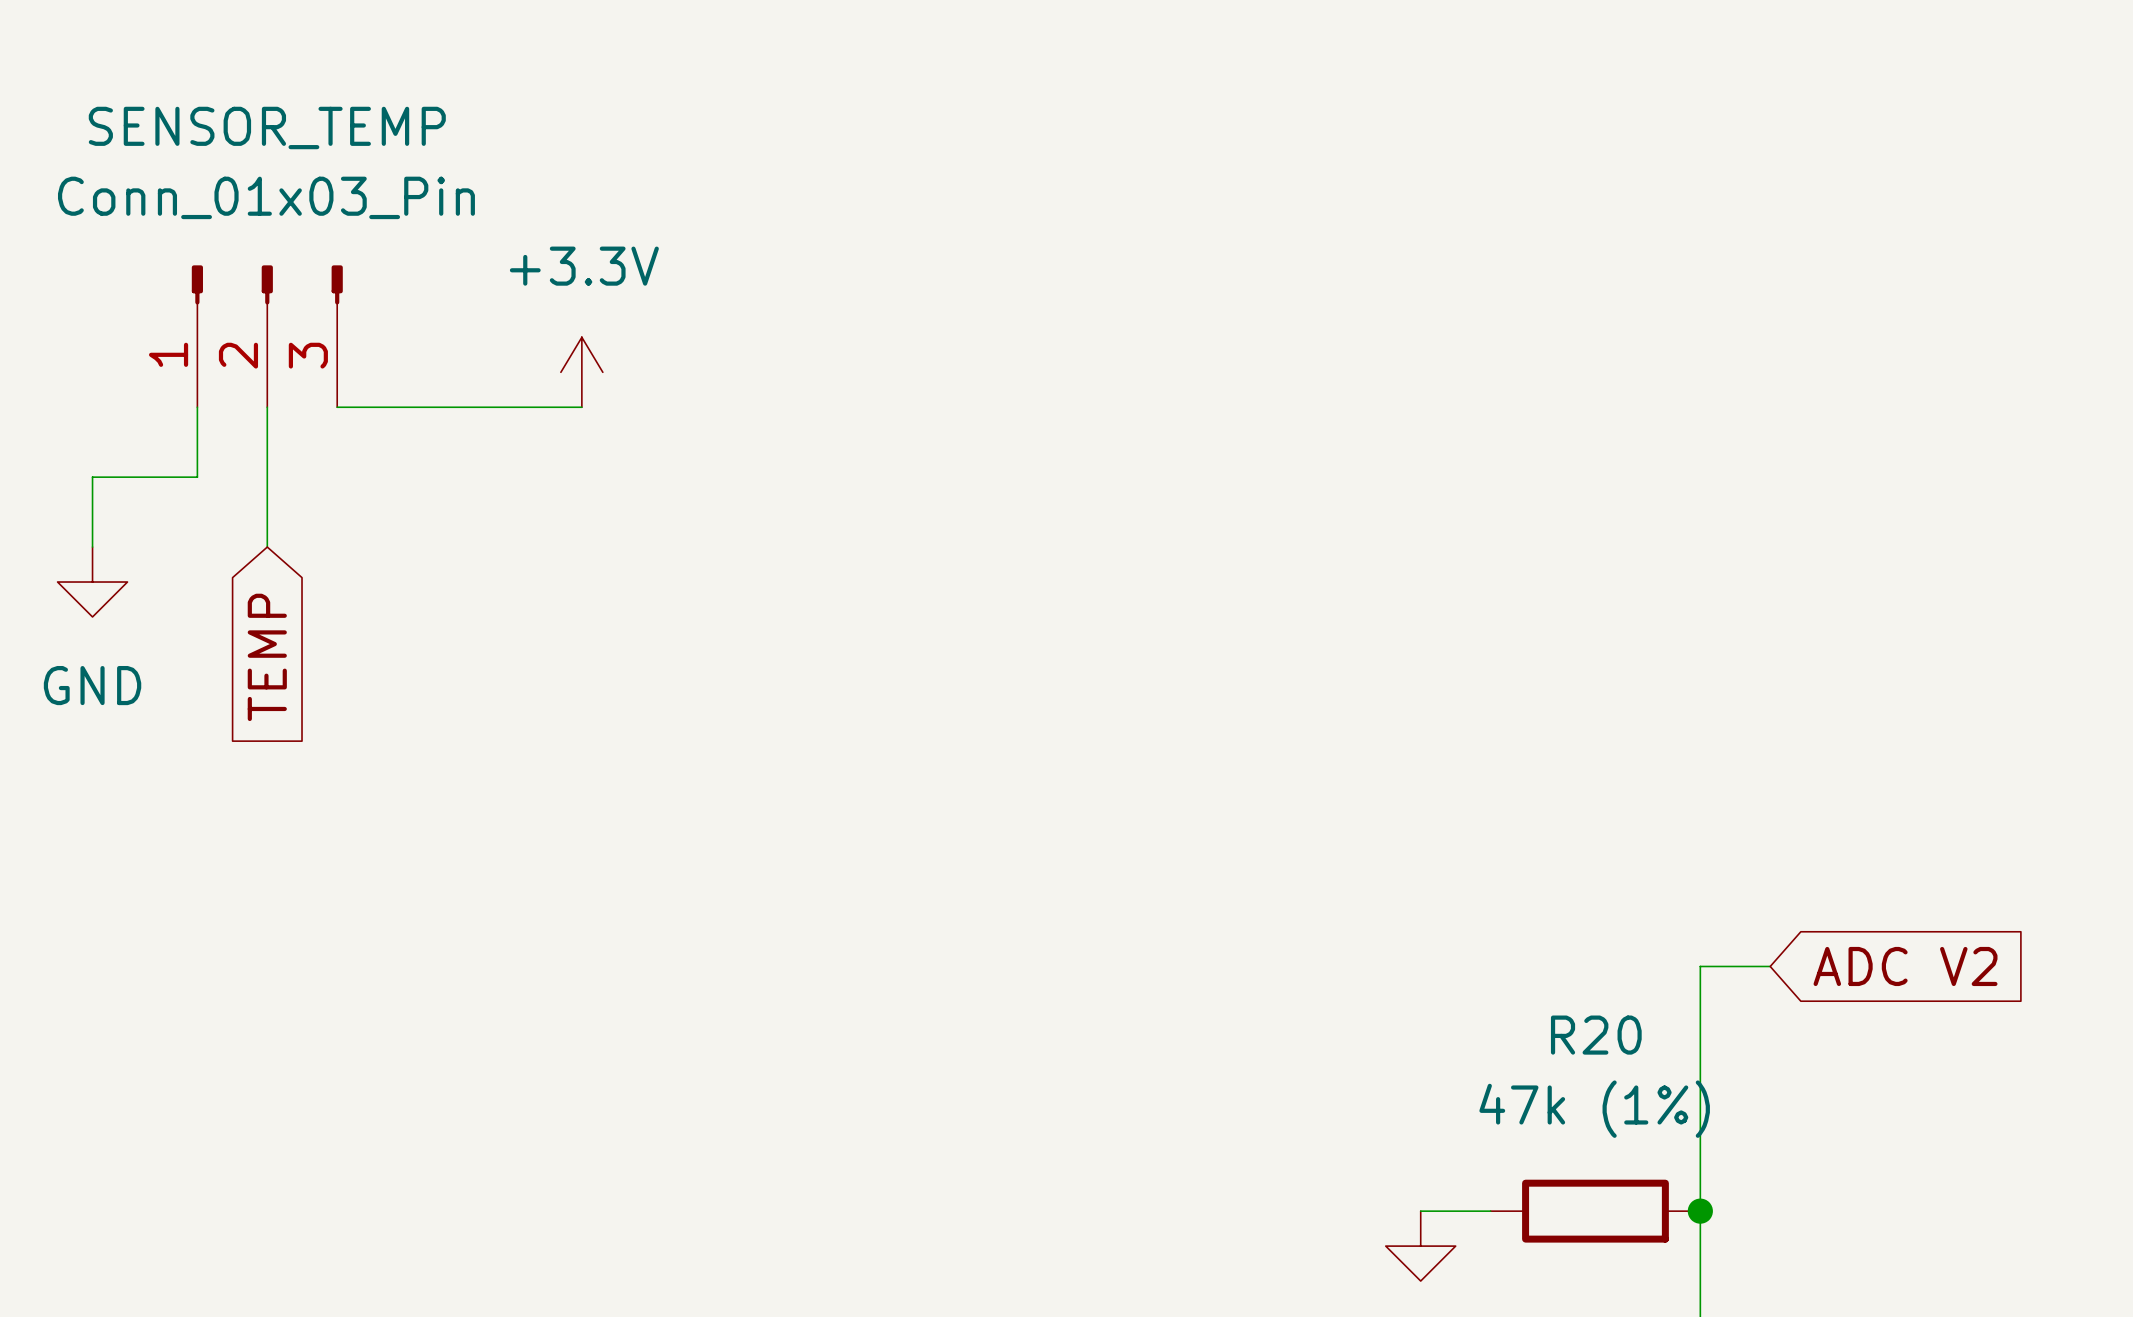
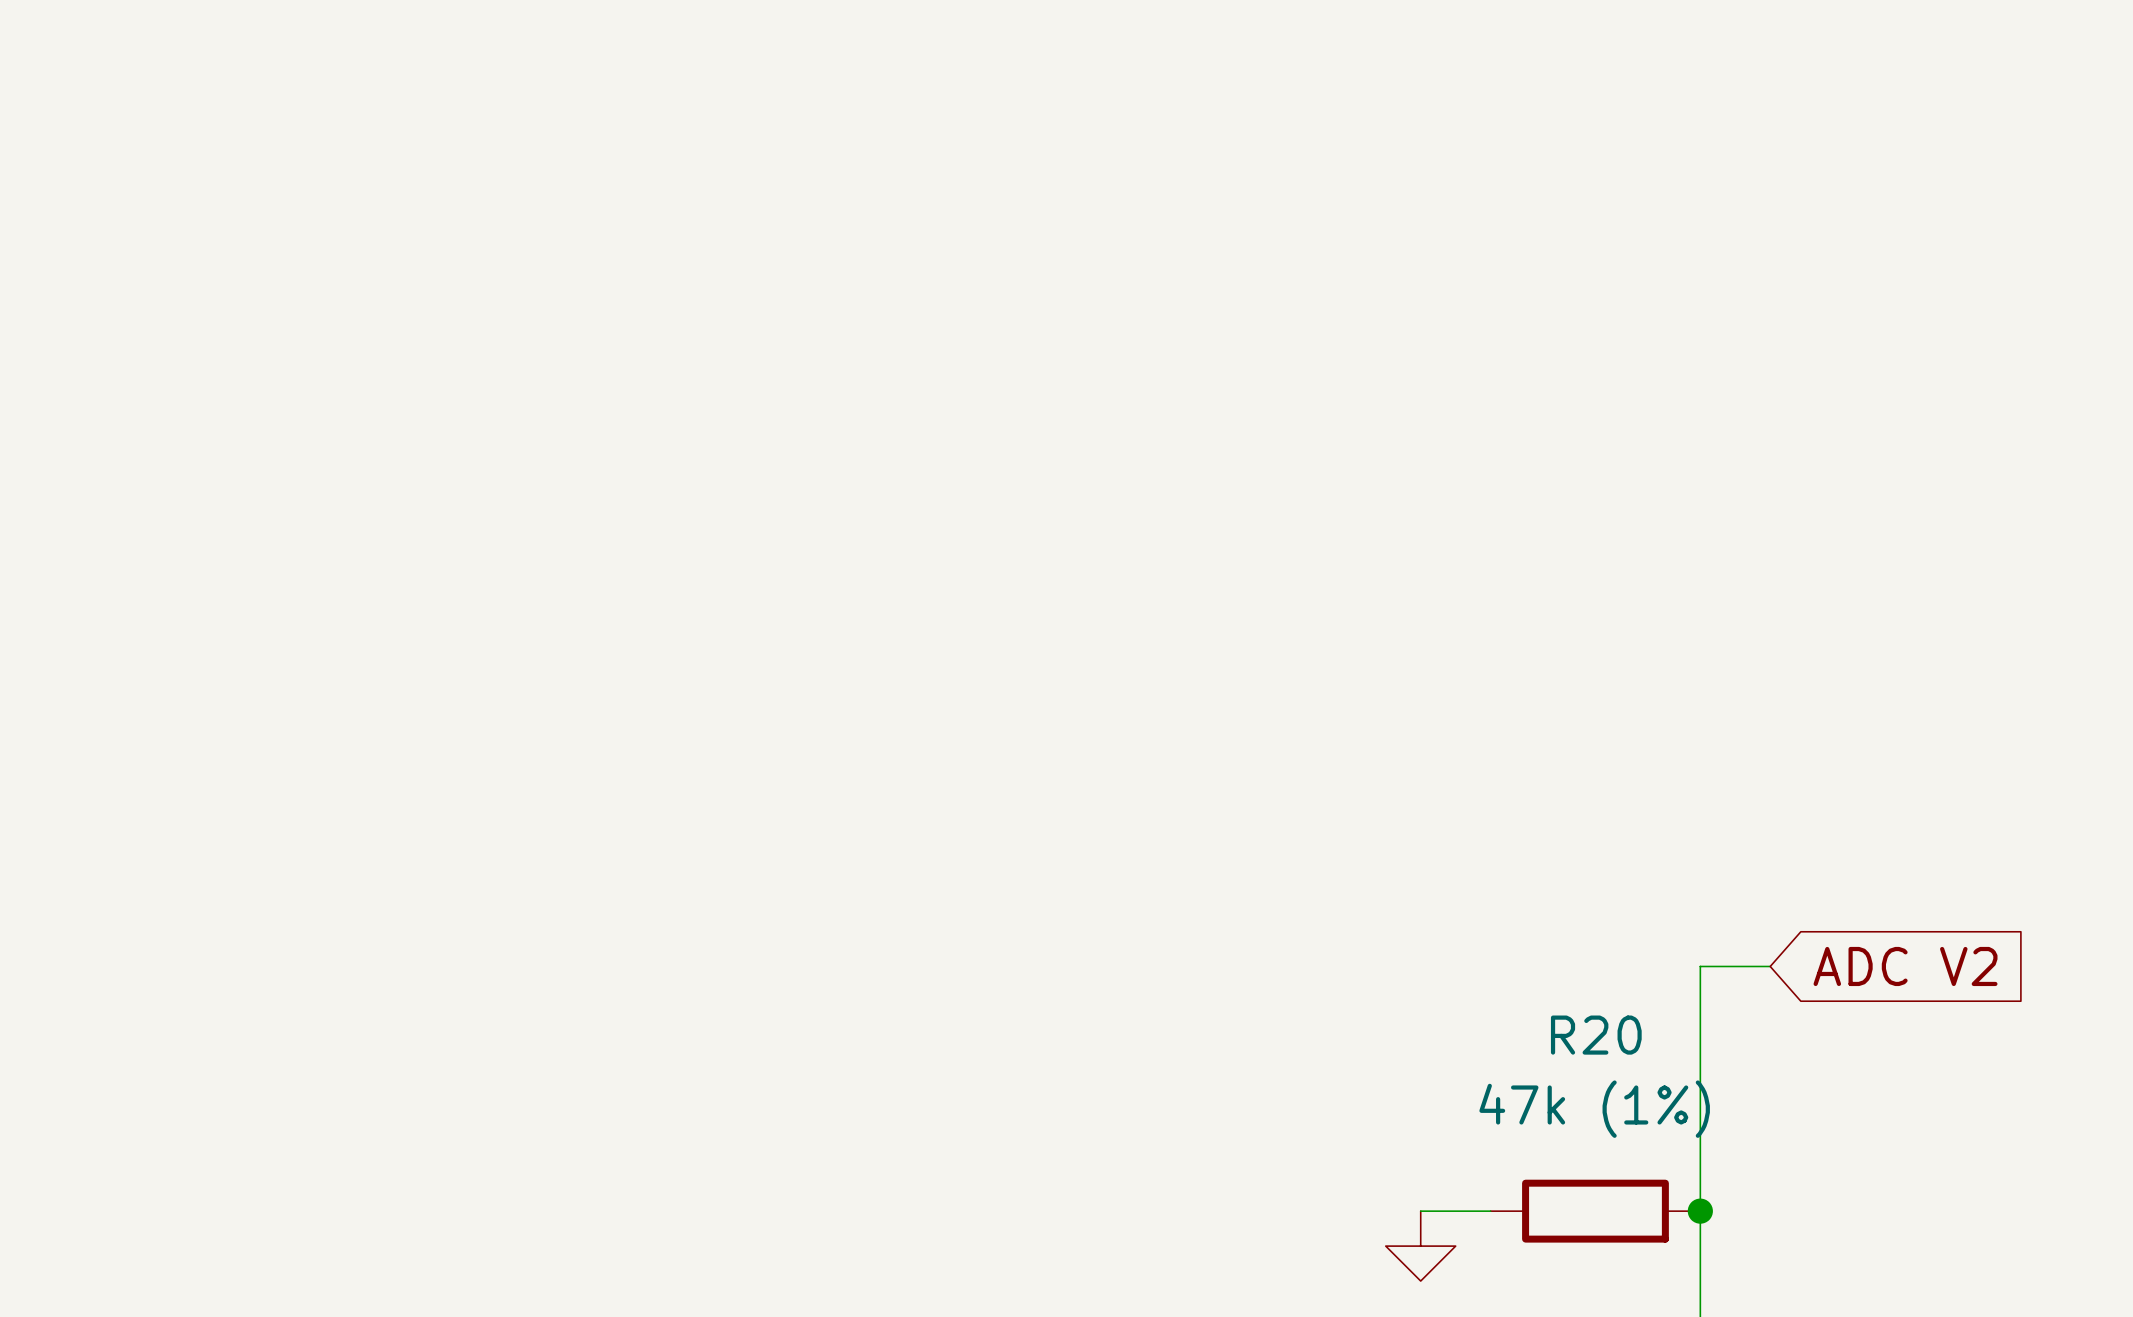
SENSOR_TEMP: Conn_01x03_Pin (267, 336) -> none
power symbol: +3.3V (581, 372) -> none
wire: (197, 407) (197, 477) (92, 477) (92, 547) -> none
wire: (267, 407) (267, 547) -> none
wire: (337, 407) (581, 407) -> none
power symbol: GND (92, 582) -> none
global label: TEMP (267, 657) -> none

